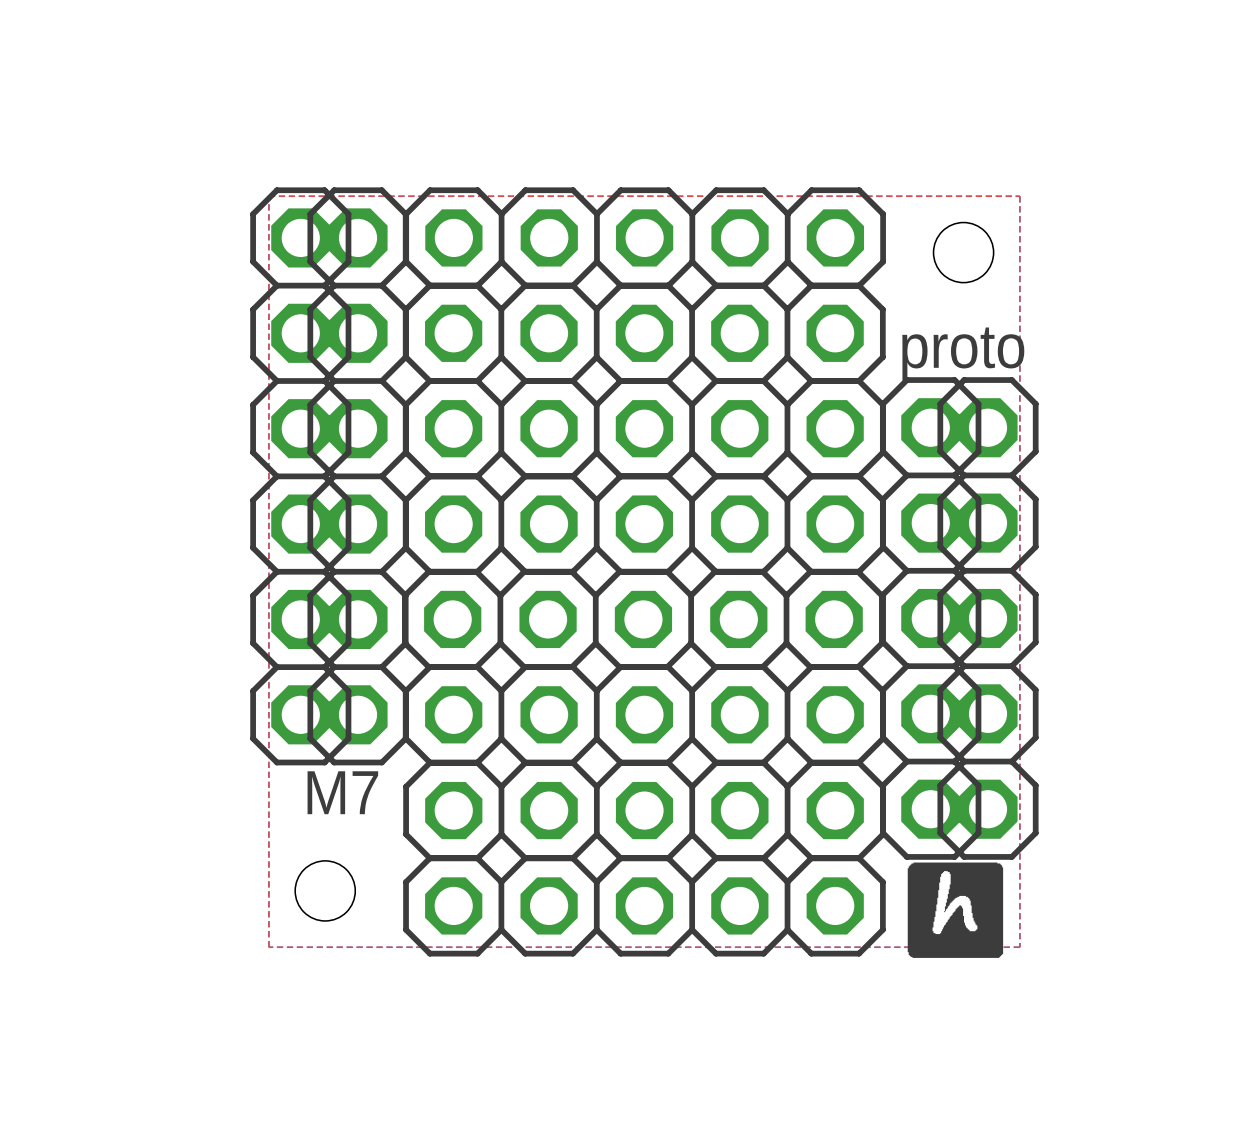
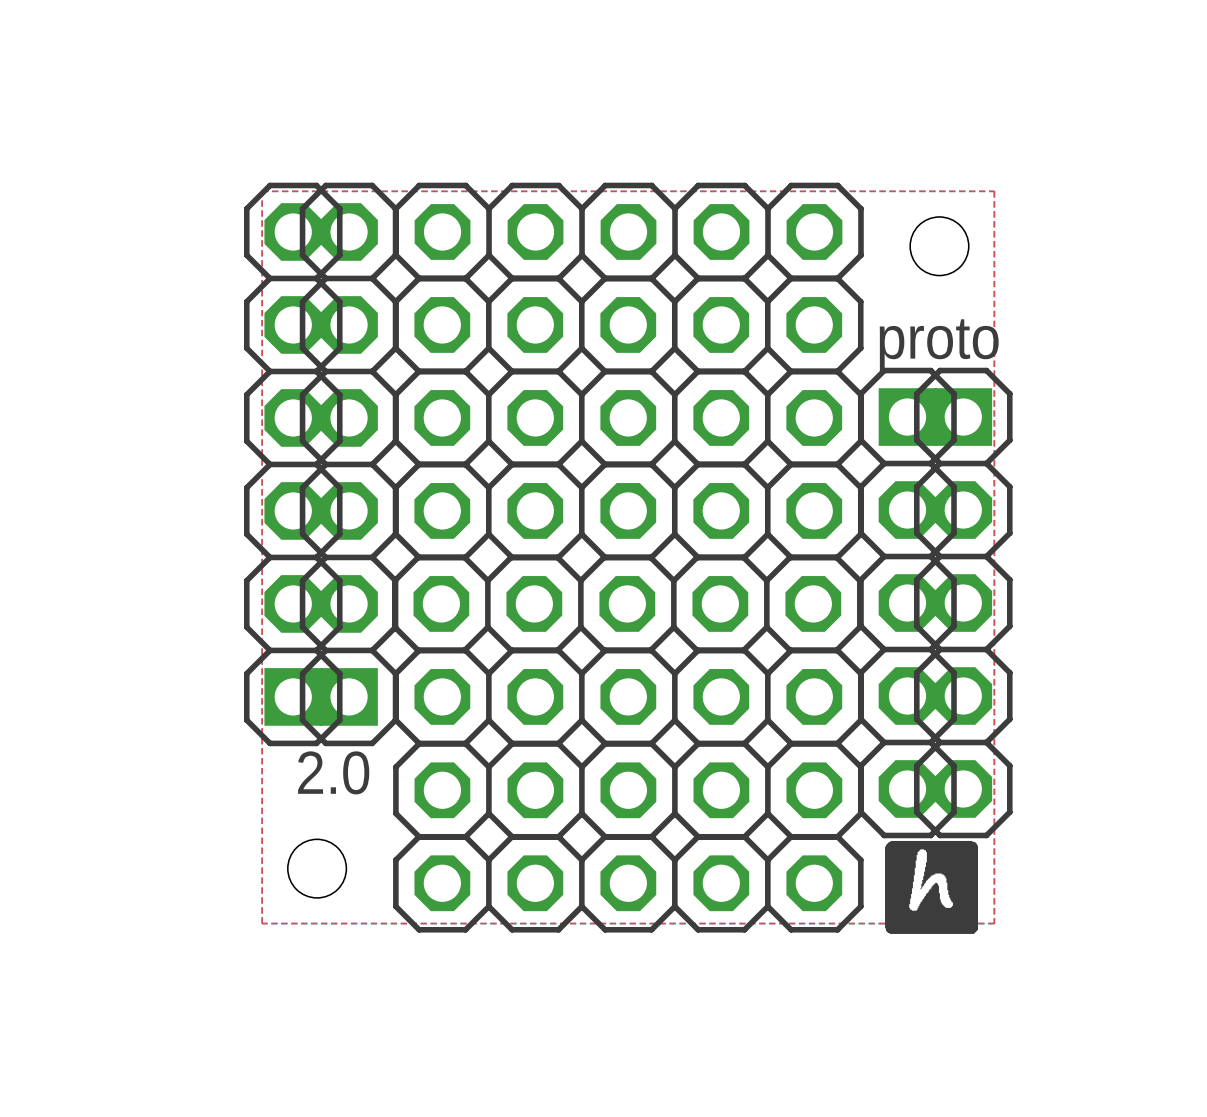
part footprint: [250, 187, 352, 766] -> [243, 182, 343, 747]
part footprint: [307, 187, 409, 766] -> [299, 182, 399, 747]
part footprint: [880, 377, 982, 860] -> [858, 367, 957, 839]
part footprint: [937, 377, 1039, 860] -> [914, 367, 1013, 839]
text: M7 (342, 792) -> 2.0 (333, 772)

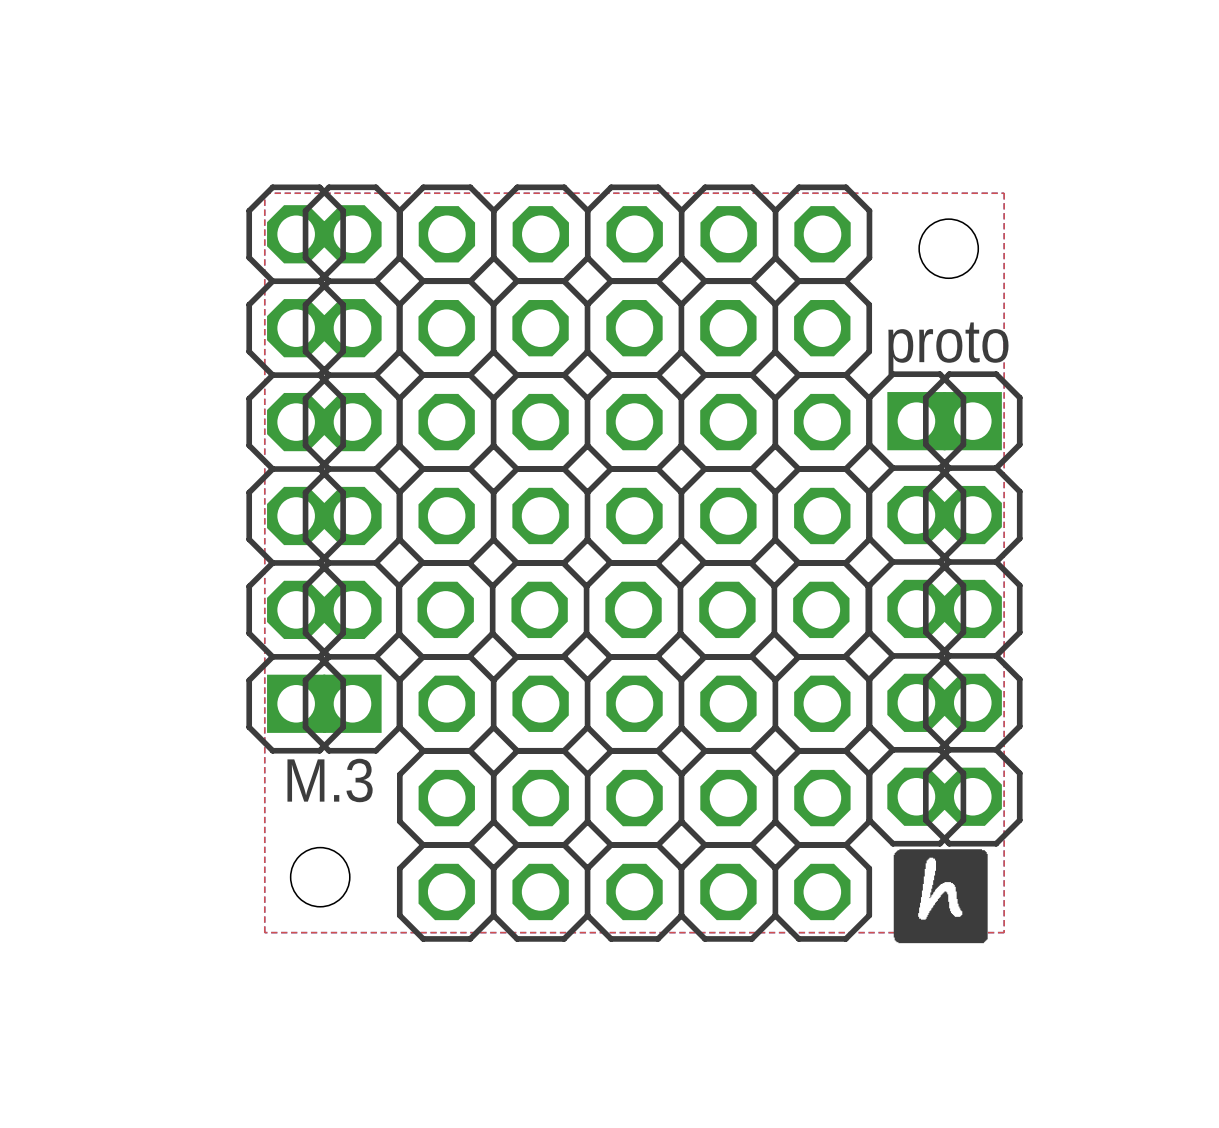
text: 2.0 (333, 772) -> M.3 (330, 780)

